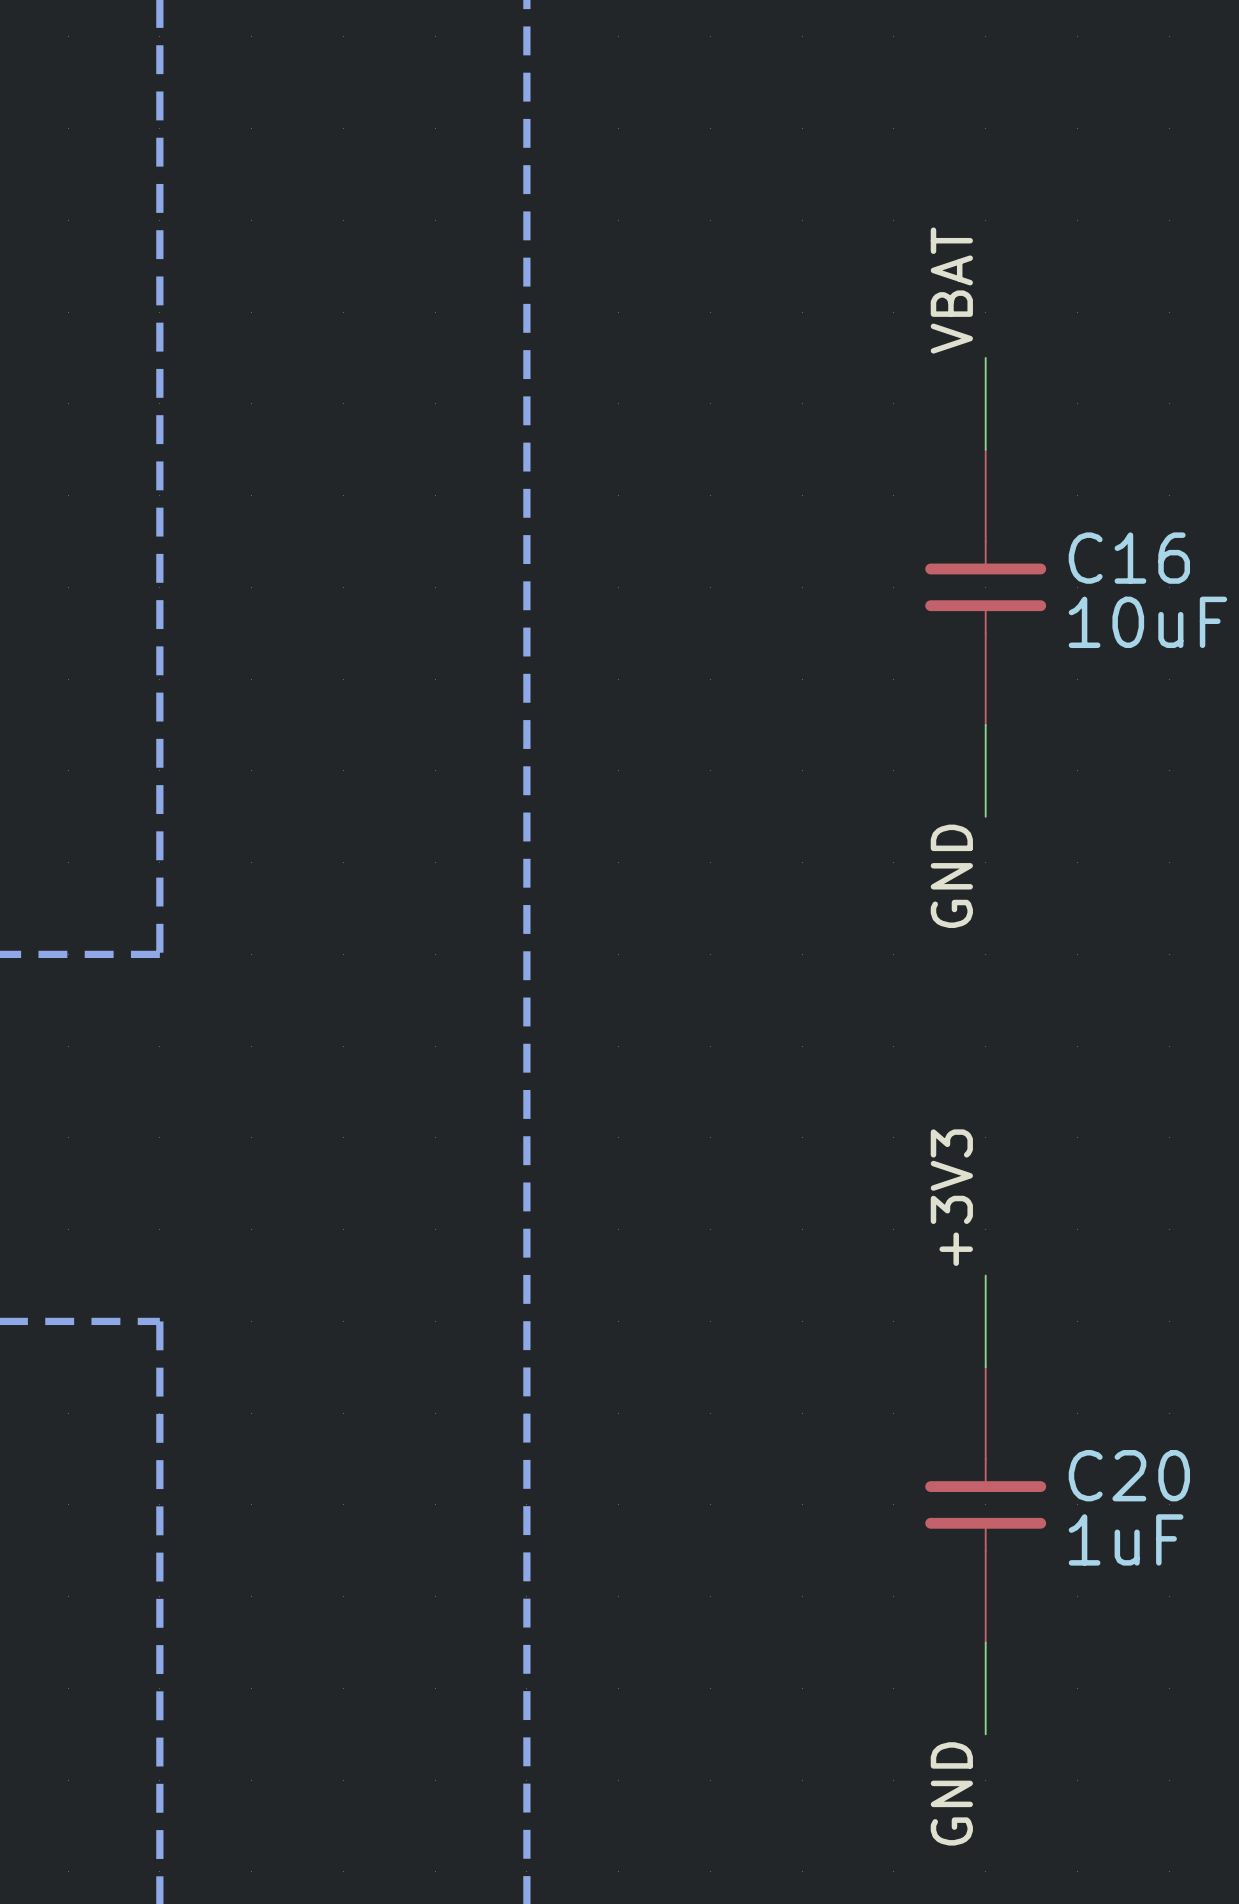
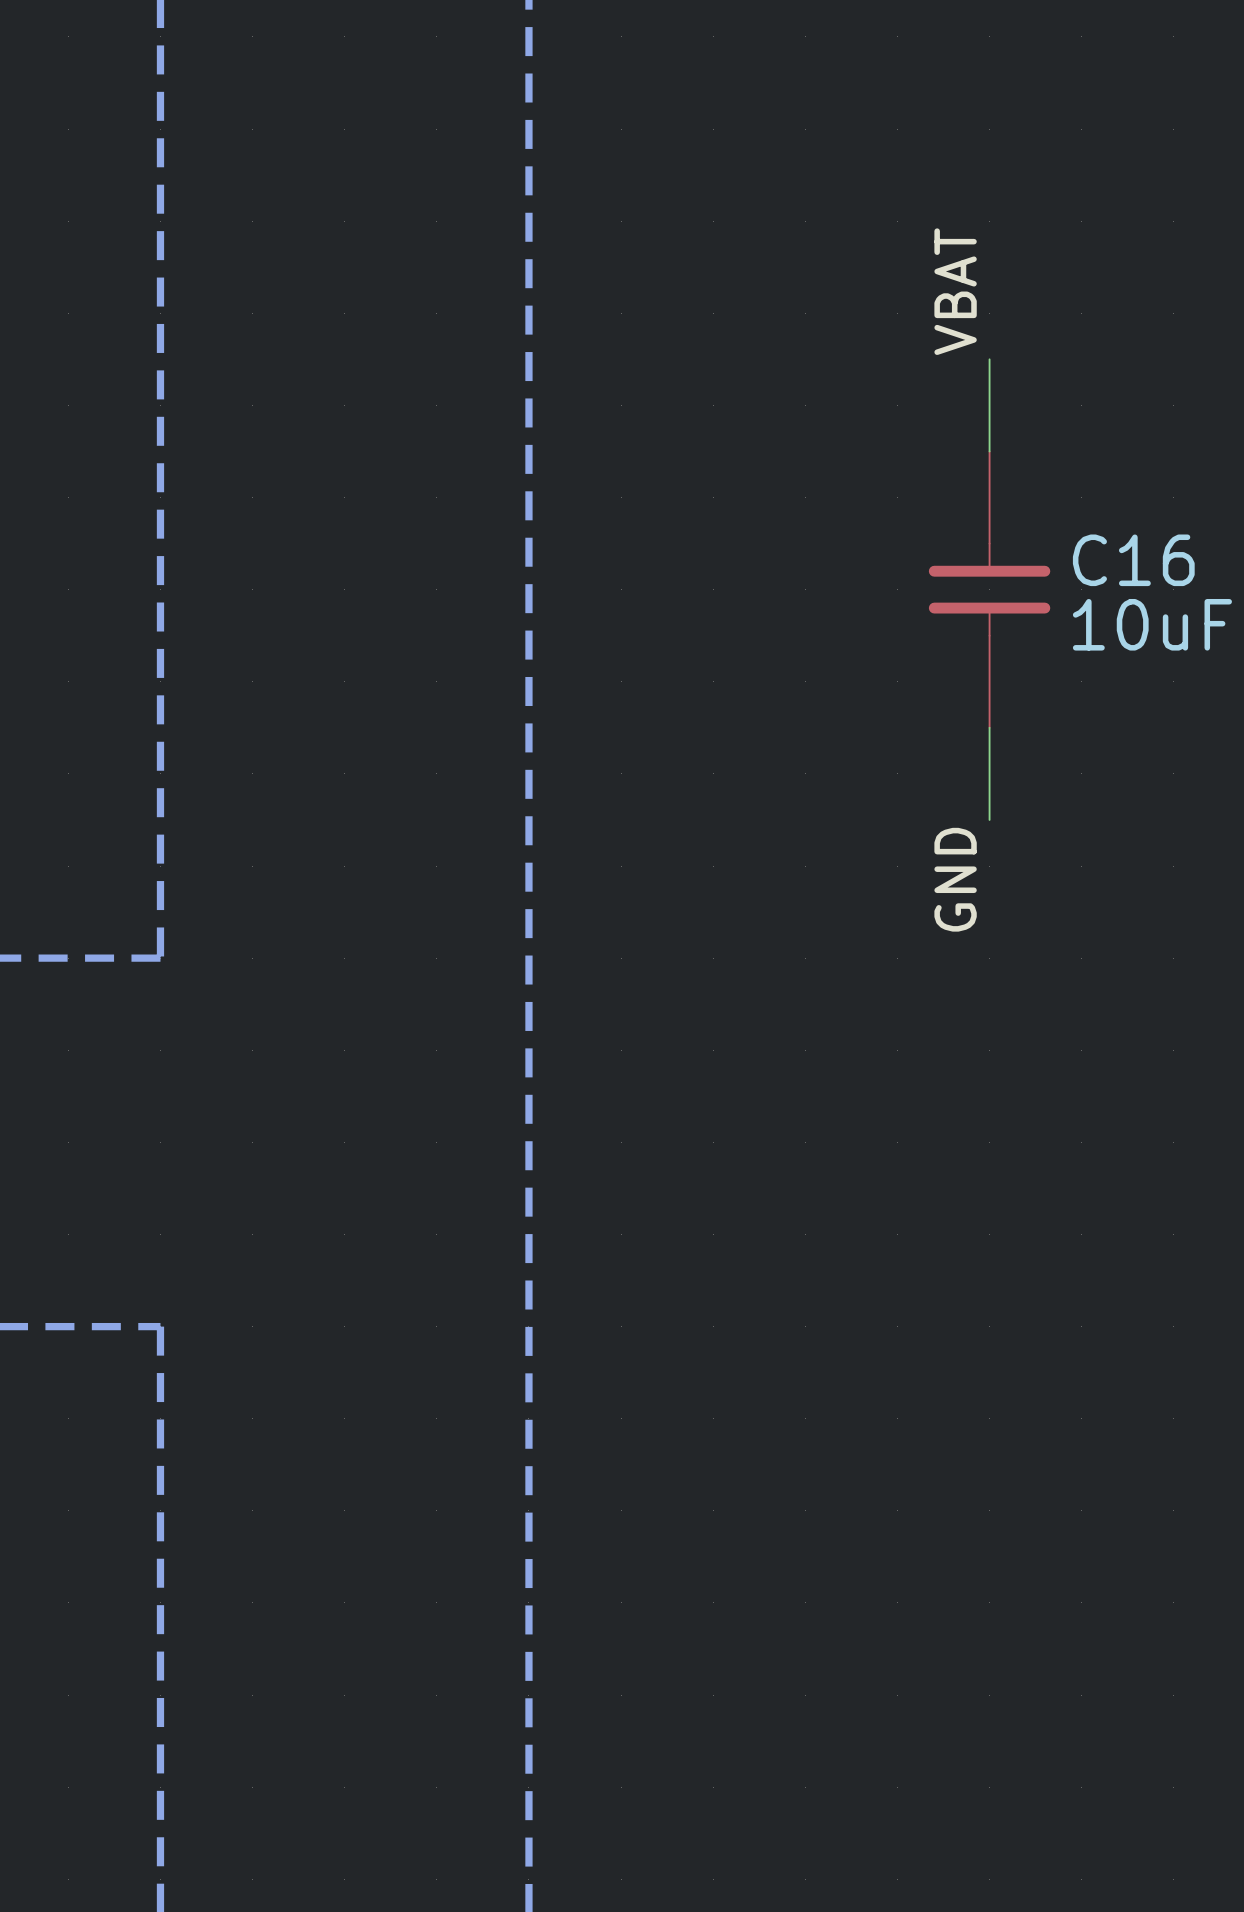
label: +3V3 (951, 1197) -> none
wire: (985, 1275) (985, 1367) -> none
C20: 1uF (985, 1504) -> none
wire: (985, 1642) (985, 1734) -> none
label: GND (951, 1793) -> none

